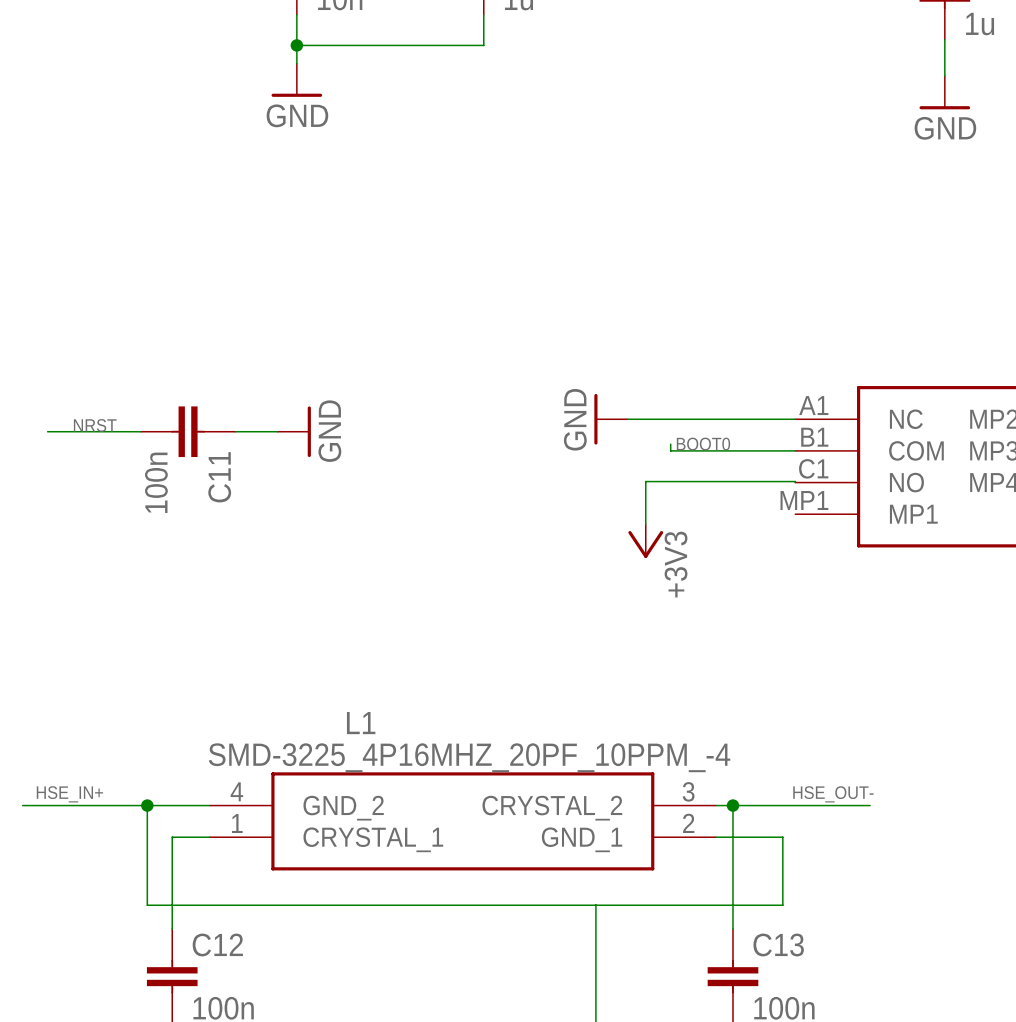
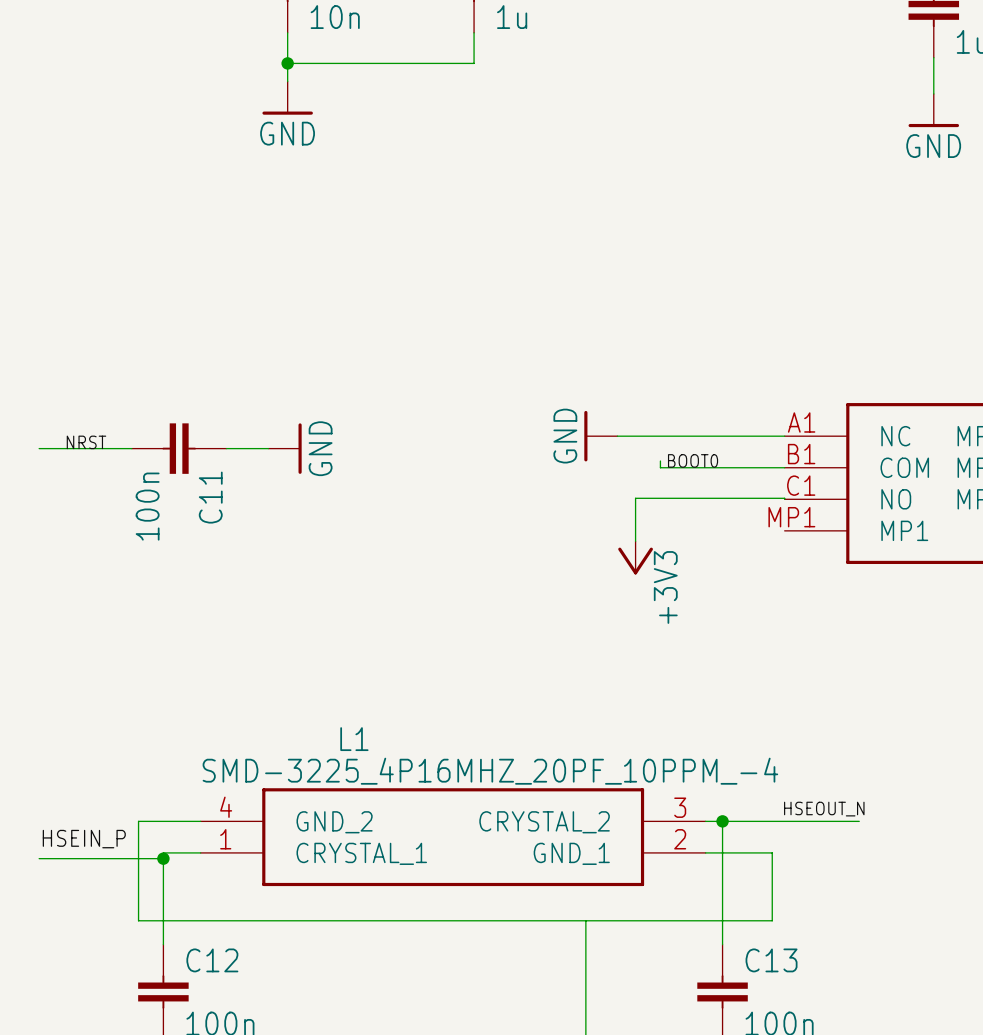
label: HSE_IN+ (69, 794) -> none
label: HSE_OUT- (833, 794) -> HSEOUT_N (824, 809)
wire: (22, 805) (147, 805) -> (39, 858) (163, 858)
junction position: (147, 805) -> (163, 858)
label: none -> HSEIN_P (84, 839)

